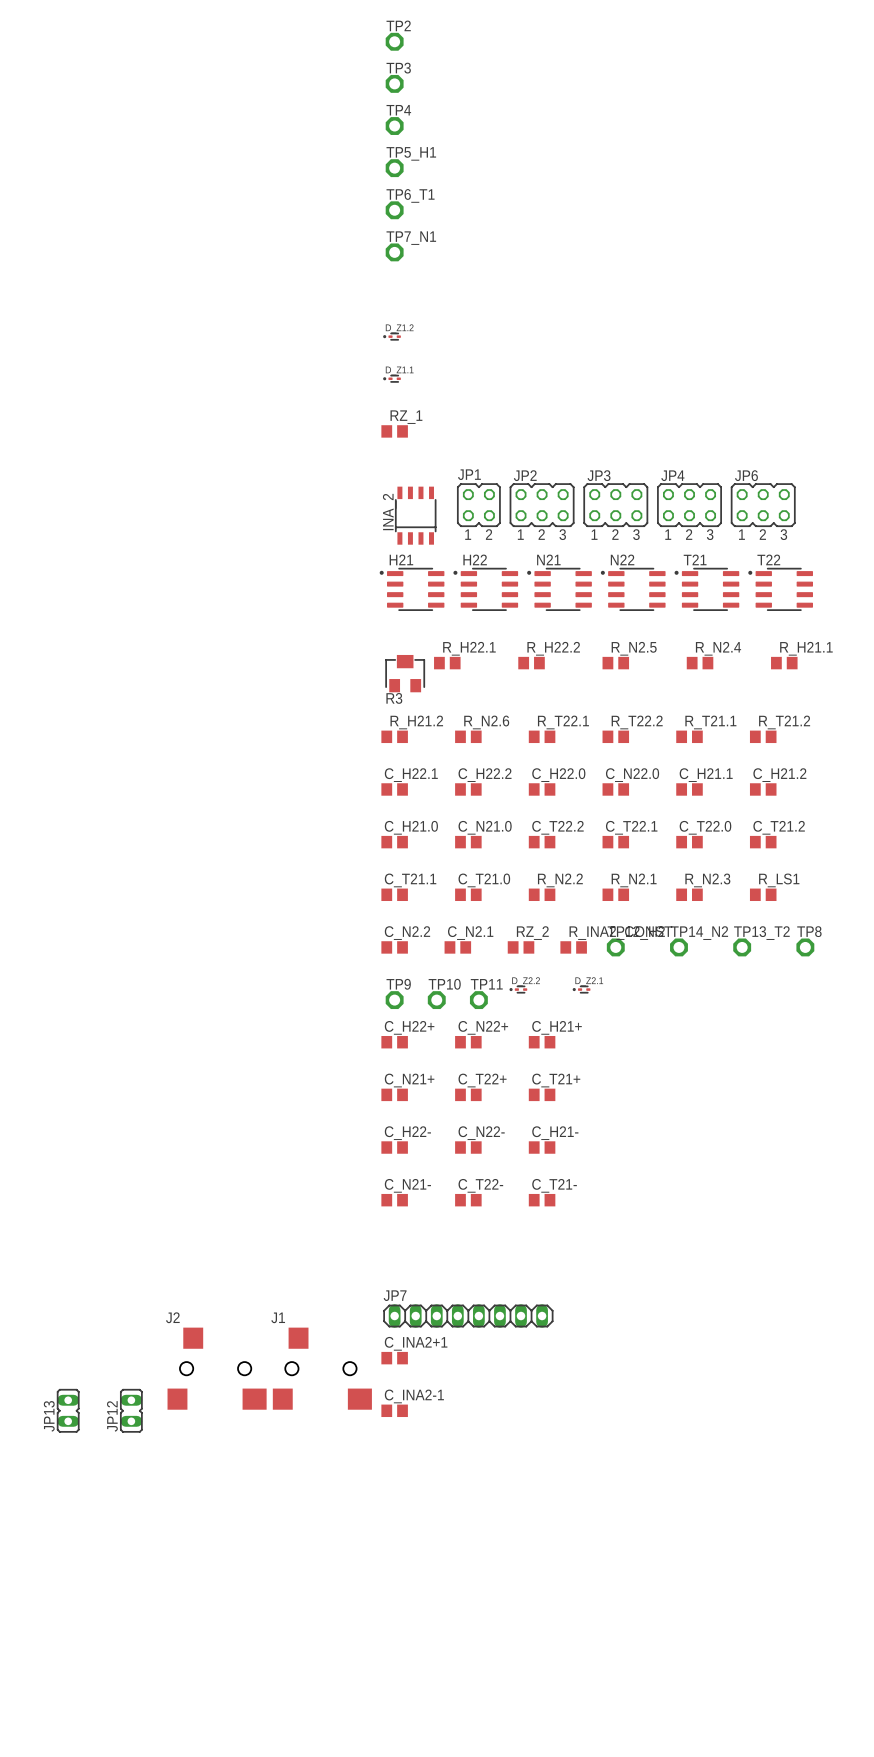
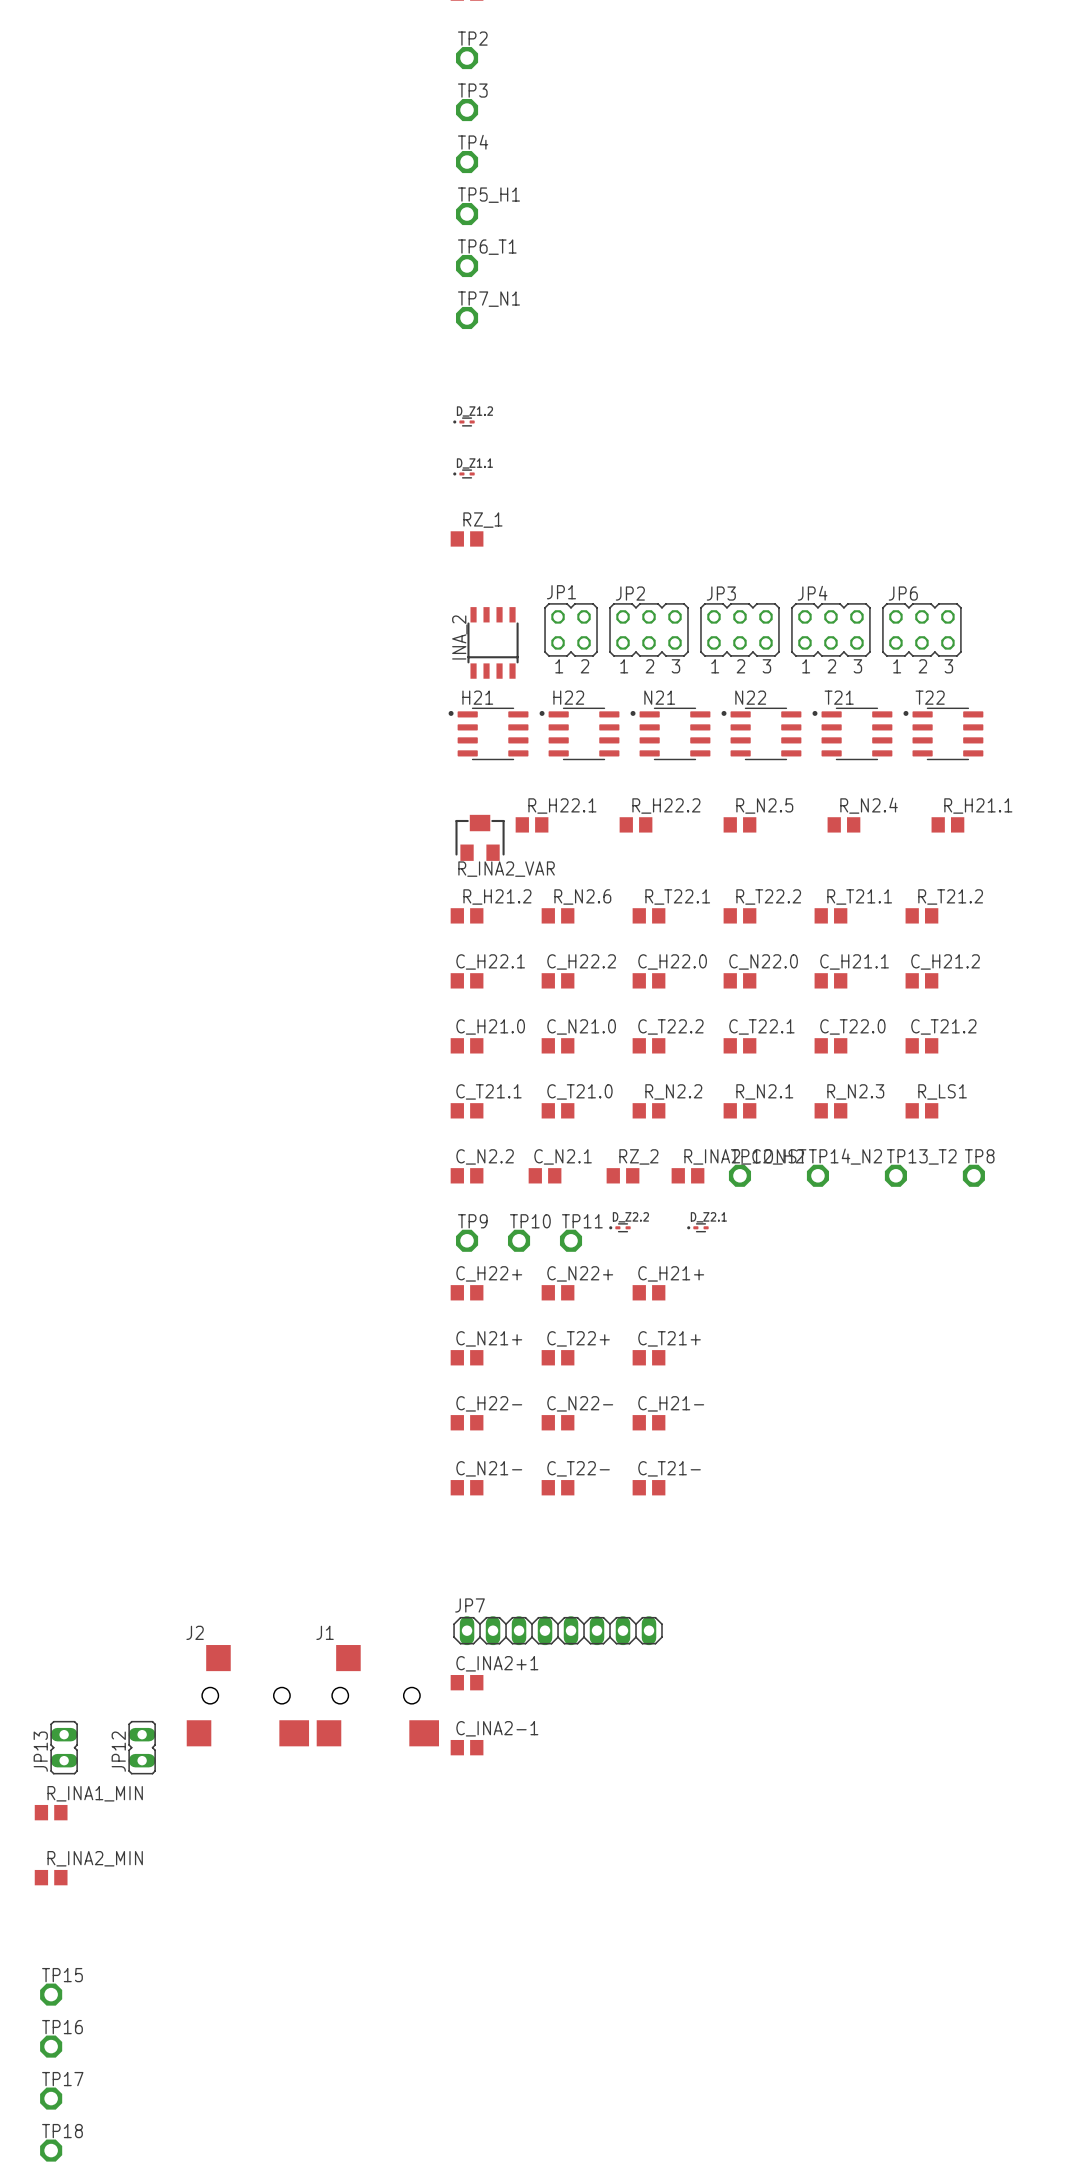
R3 name: R3 (394, 698) -> R_INA2_VAR (506, 869)
R_INA1_MIN: none -> (51, 1812)
R_INA2_MIN: none -> (51, 1877)
TP15: none -> (51, 1994)
TP16: none -> (51, 2046)
TP17: none -> (51, 2098)
TP18: none -> (51, 2150)

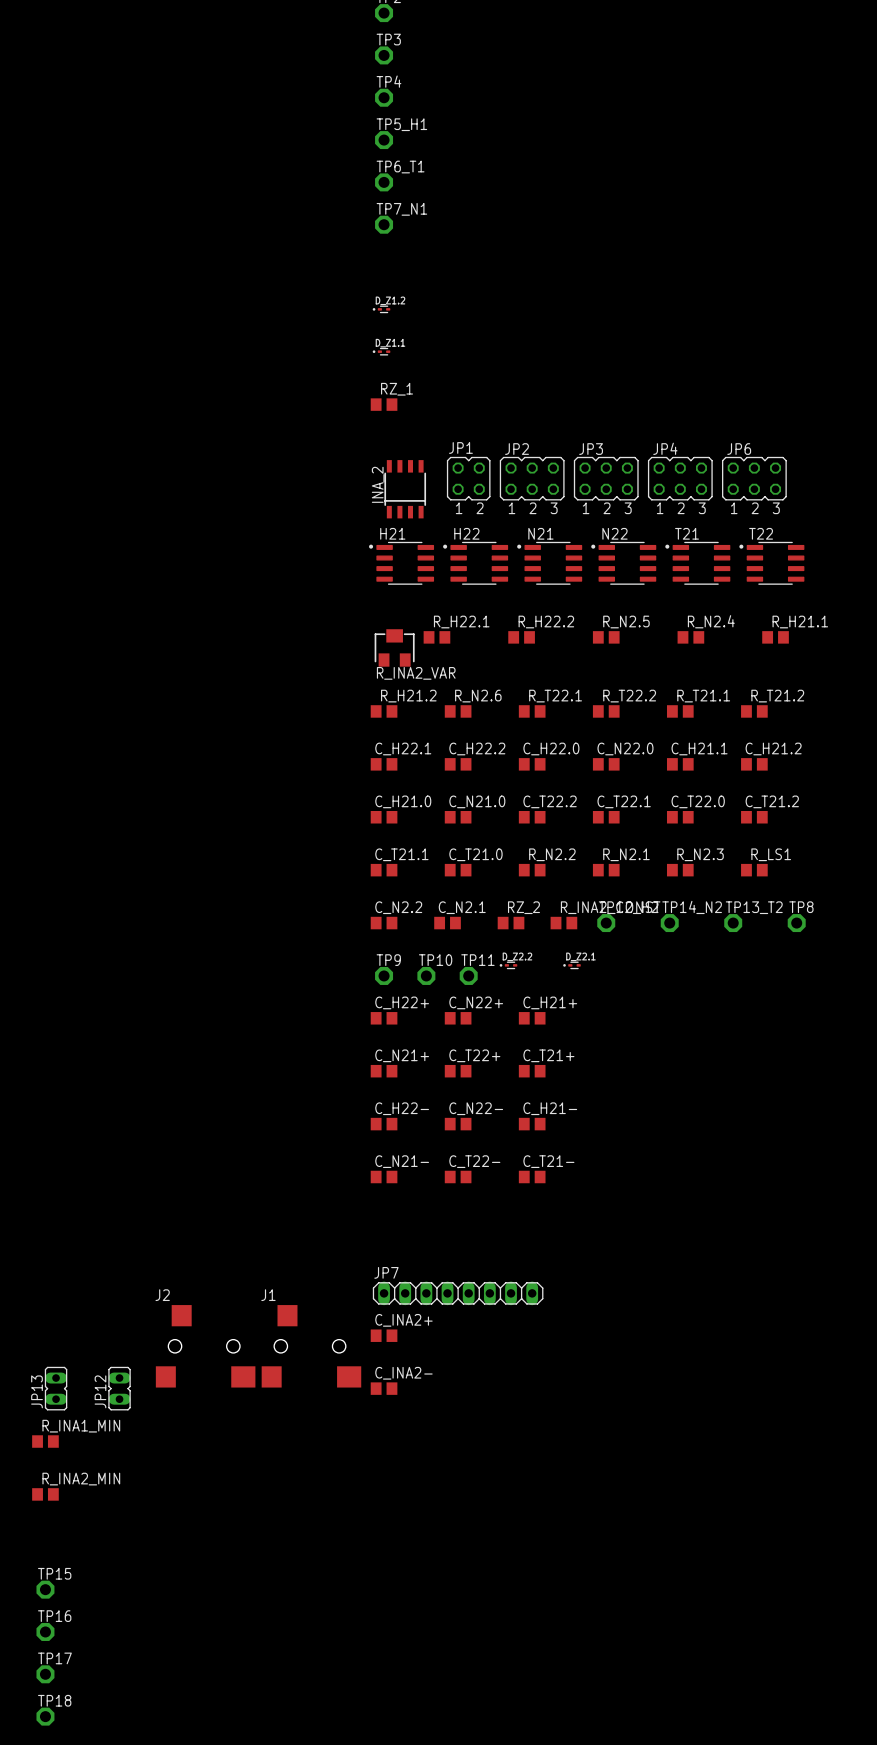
C_INA2+1 name: C_INA2+1 (497, 1663) -> C_INA2+ (403, 1320)
C_INA2-1 name: C_INA2-1 (497, 1728) -> C_INA2- (403, 1373)

